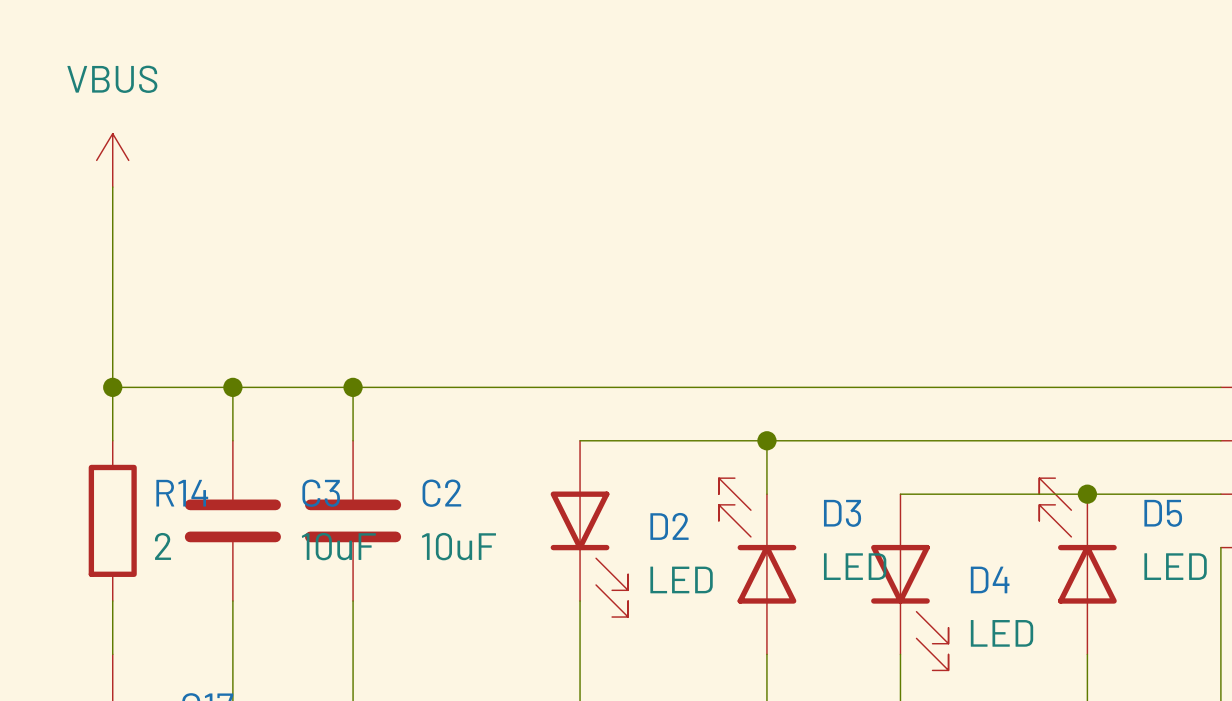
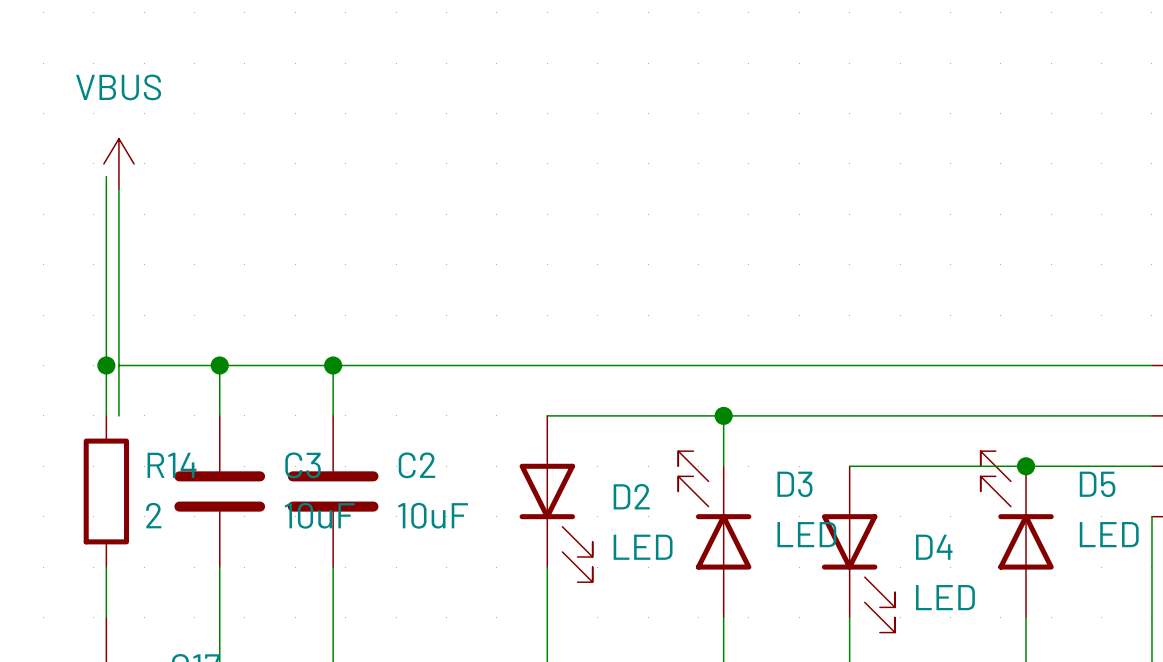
power symbol position: VBUS (112, 160) -> VBUS (118, 163)
wire: none -> (118, 189) (118, 415)

